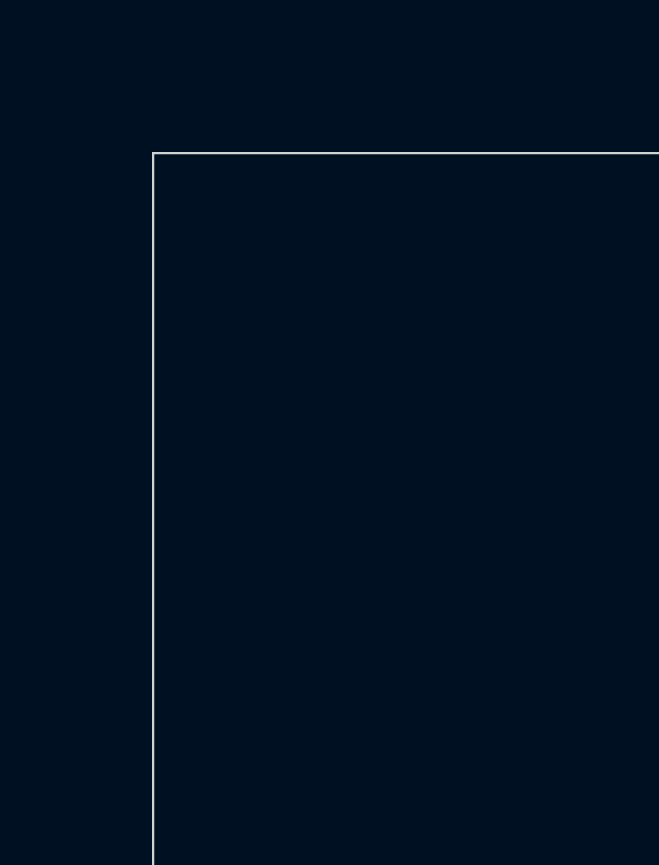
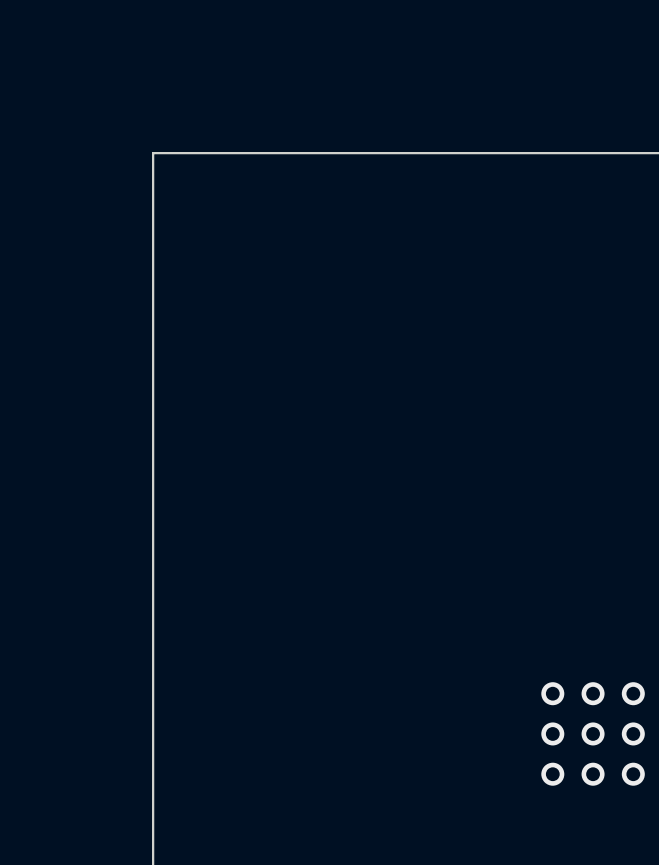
via: none -> (552, 693)
via: none -> (593, 693)
via: none -> (633, 693)
via: none -> (552, 733)
via: none -> (593, 733)
via: none -> (633, 733)
via: none -> (552, 774)
via: none -> (593, 774)
via: none -> (633, 774)

